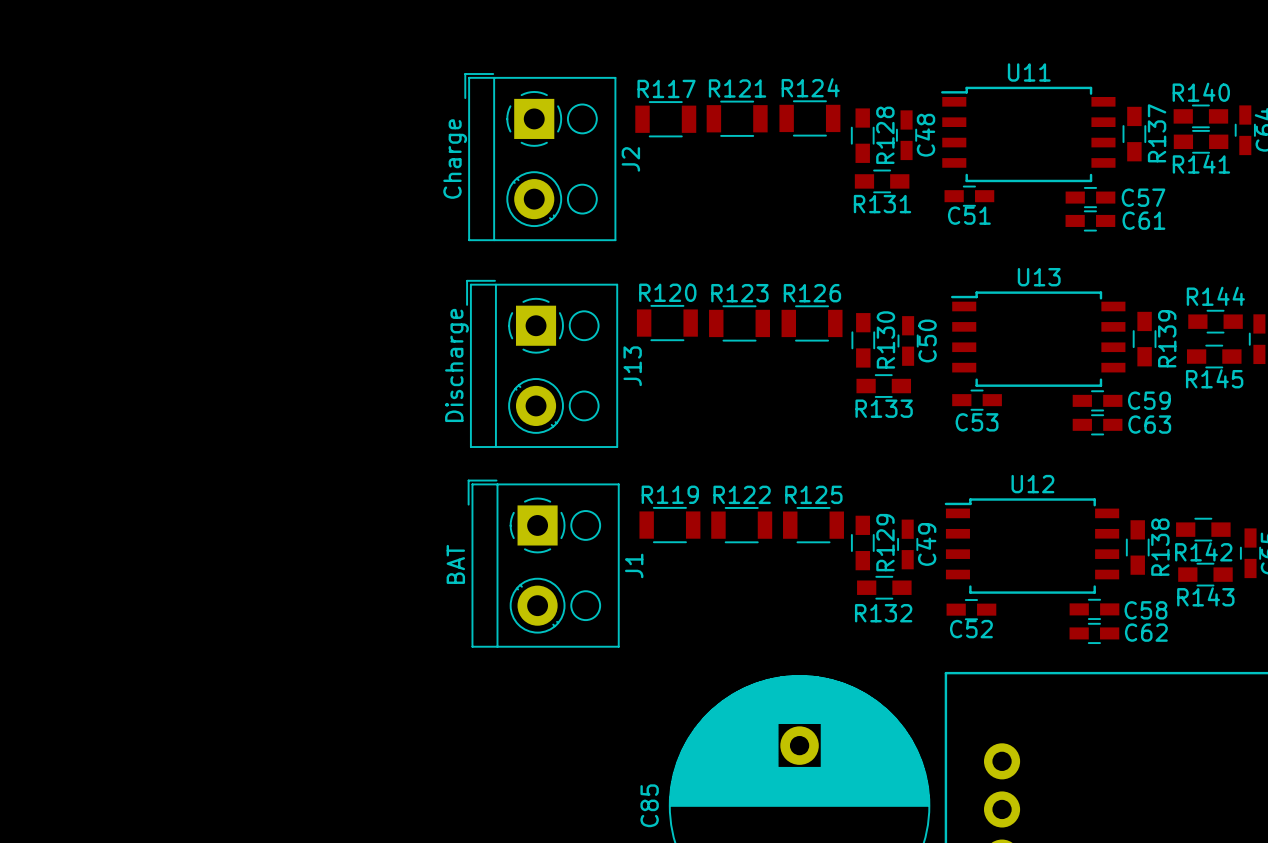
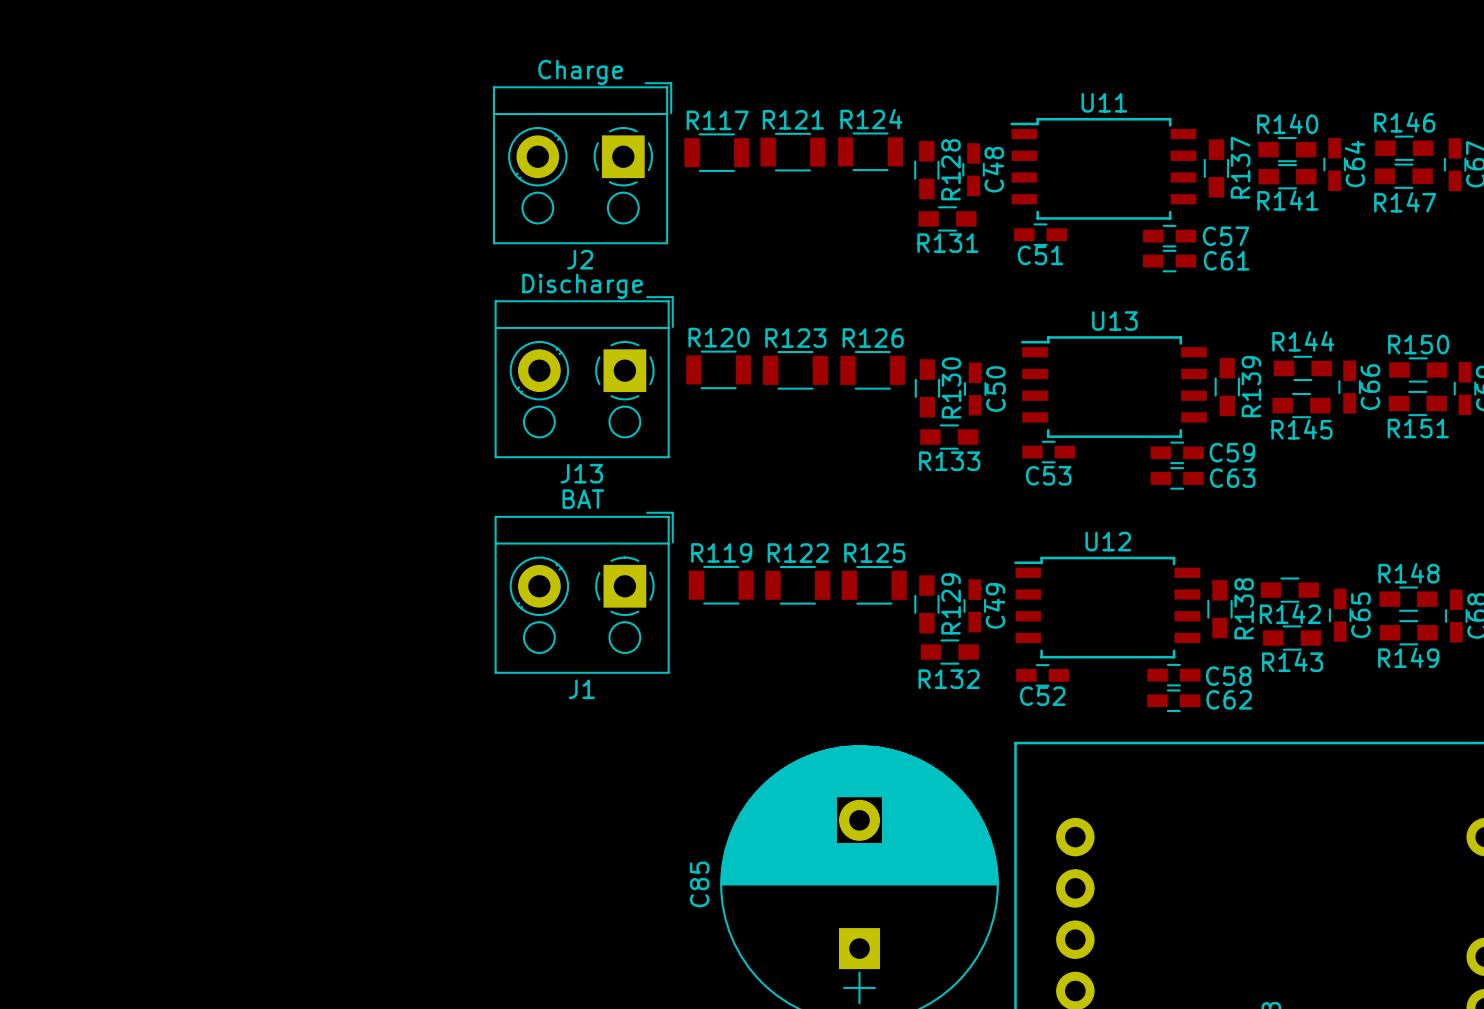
J2 rotation: 0° (540, 157) -> 90° clockwise (582, 163)
J13 rotation: 0° (542, 363) -> 90° clockwise (584, 377)
J1 rotation: 0° (543, 563) -> 90° clockwise (584, 592)

